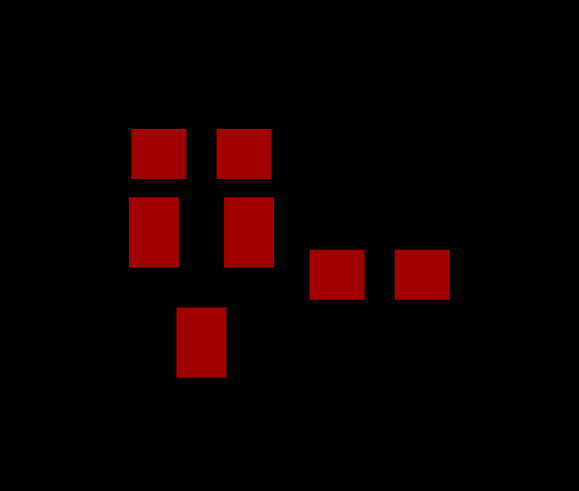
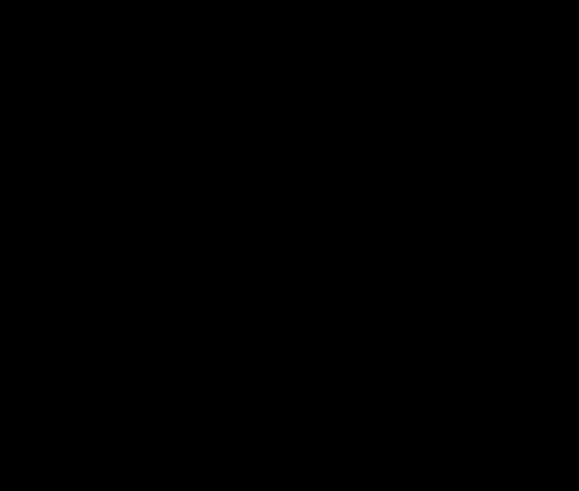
part: (201, 153) -> none
part: (379, 274) -> none
part: (201, 287) -> none

